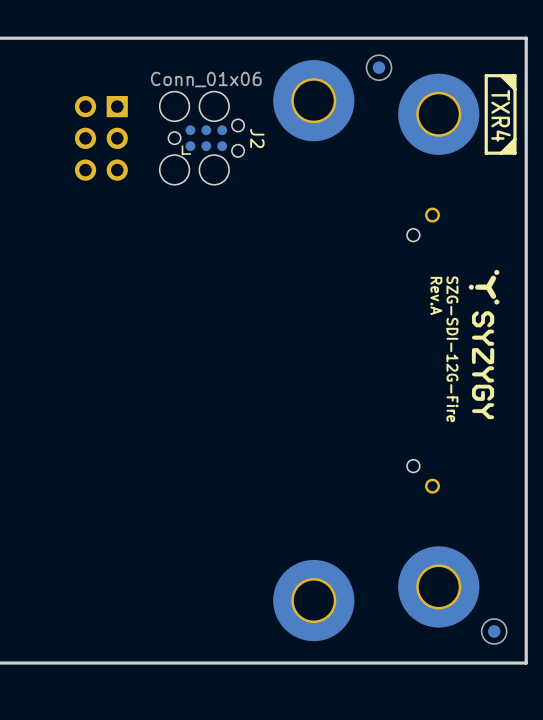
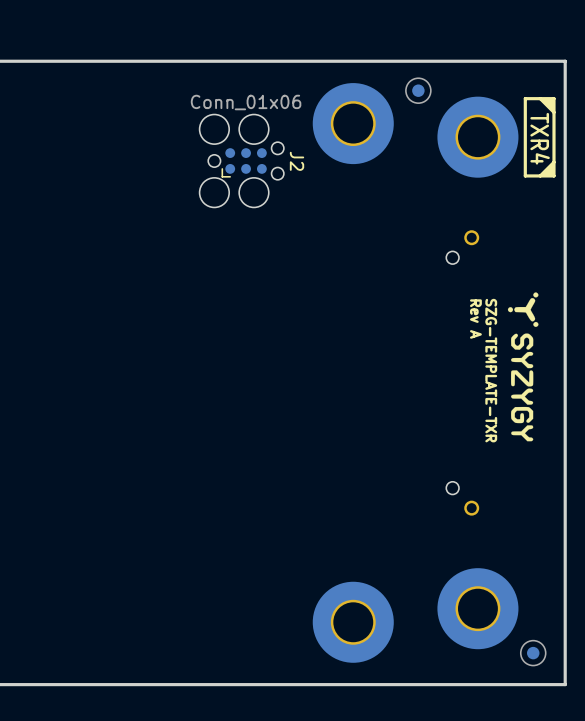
part: (101, 138) -> none
text: Rev.A (436, 295) -> Rev A (475, 319)
text: SZG-SDI-12G-Fire (452, 349) -> SZG-TEMPLATE-TXR (491, 370)

